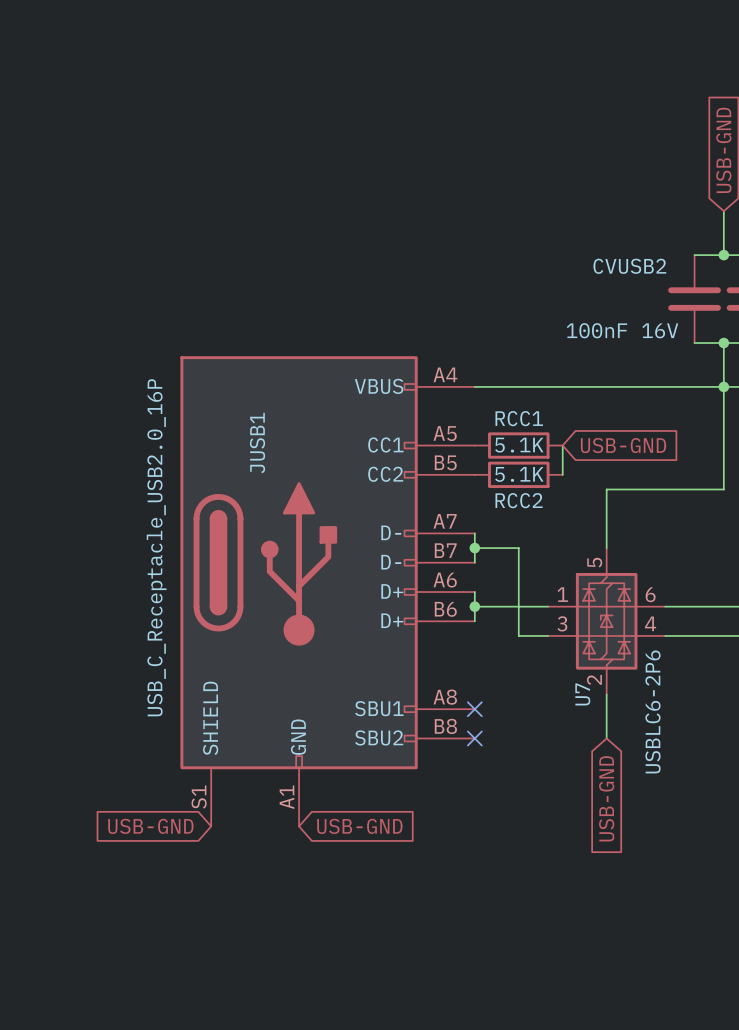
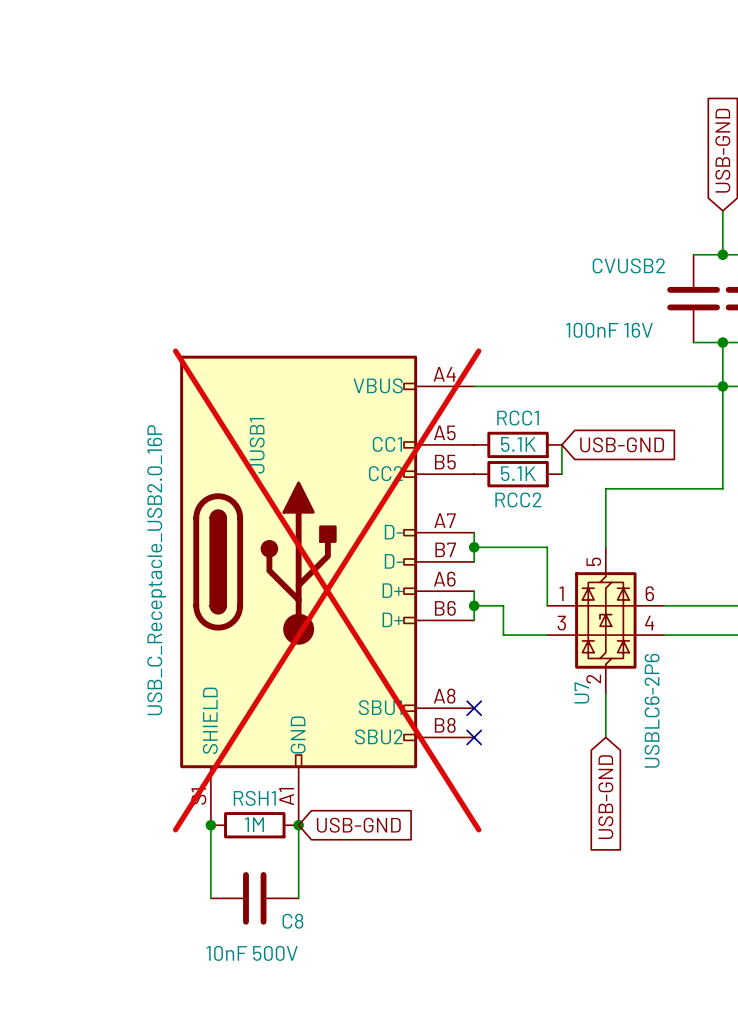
wire: (518, 548) (518, 635) -> (518, 547) (547, 547) (547, 605)
JUSB1 do-not-place cross: none -> (327, 590)
wire: (504, 606) (548, 606) -> (503, 605) (503, 635) (518, 635)
global label: USB-GND (150, 826) -> none
wire: none -> (210, 825) (210, 898)
junction: none -> (210, 825)
RSH1: none -> 1M (254, 825)
wire: none -> (298, 825) (298, 898)
junction: none -> (298, 825)
C8: none -> 10nF 500V (254, 898)

